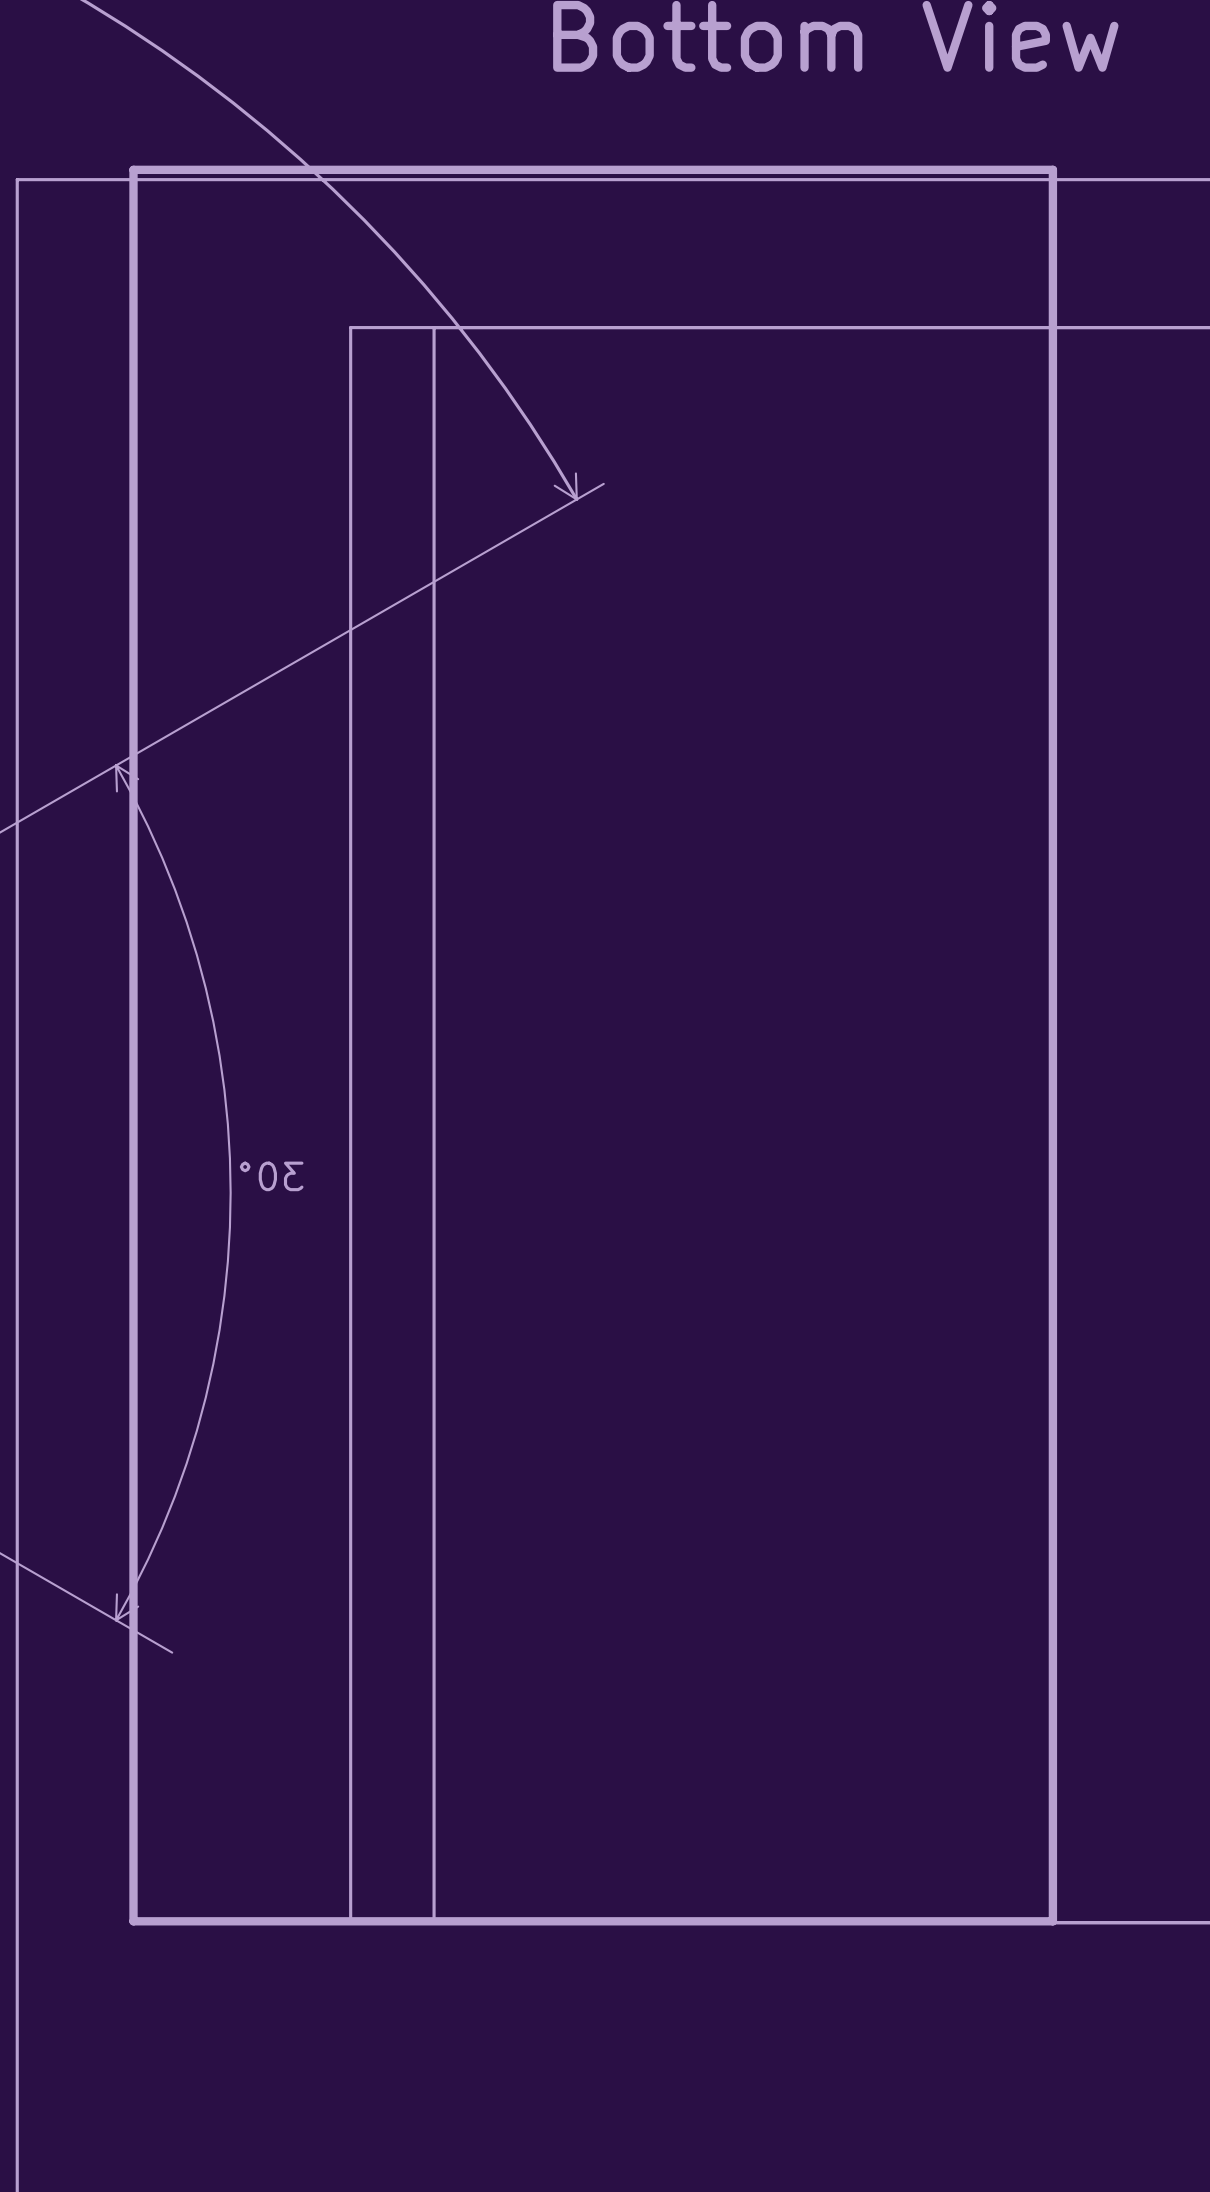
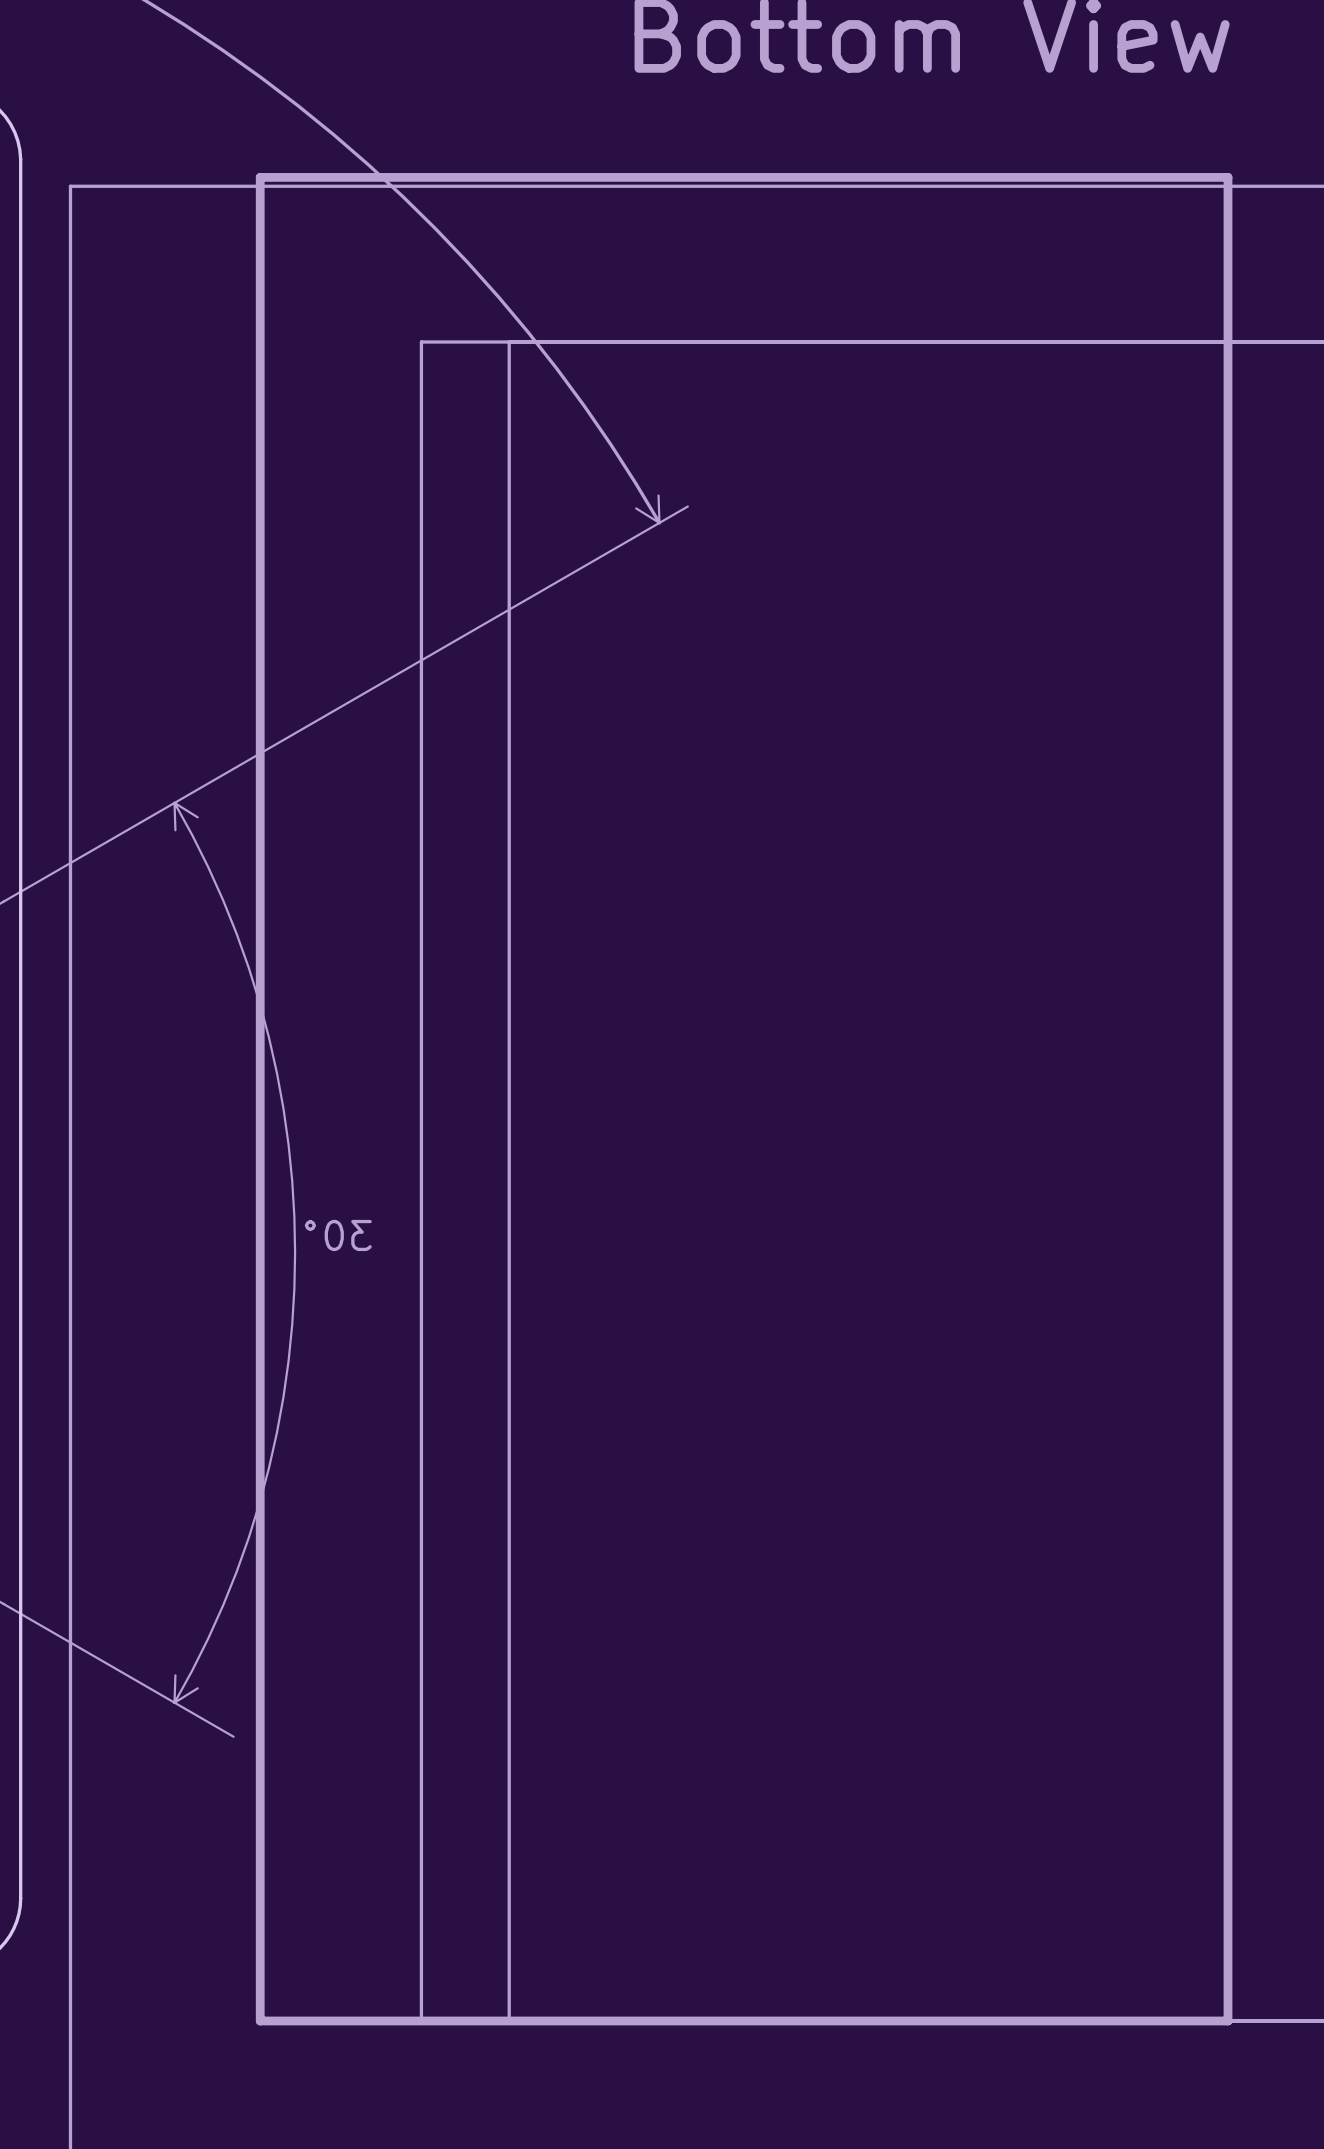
line: (133, 169) (1052, 169) (1052, 1921) (133, 1921) (133, 169) -> (260, 177) (1228, 177) (1228, 2020) (260, 2020) (260, 177)

